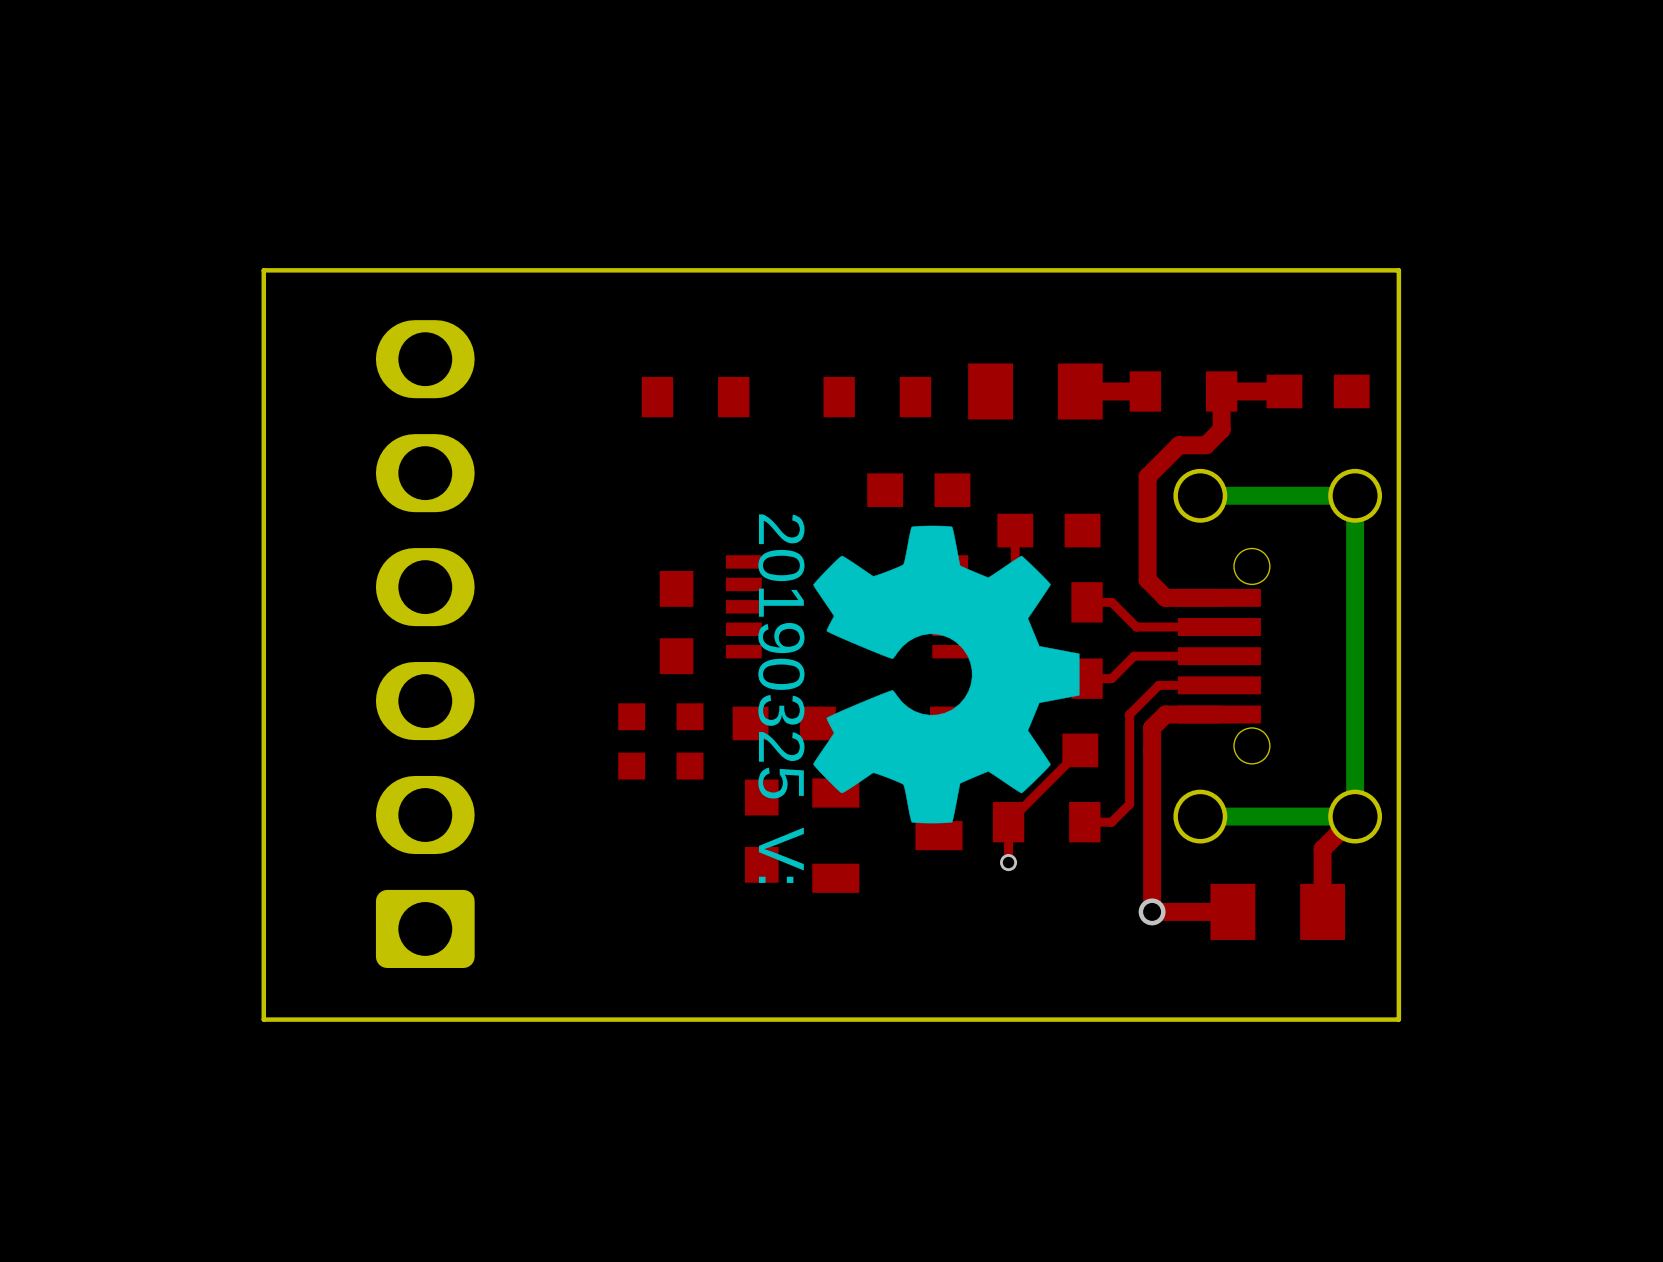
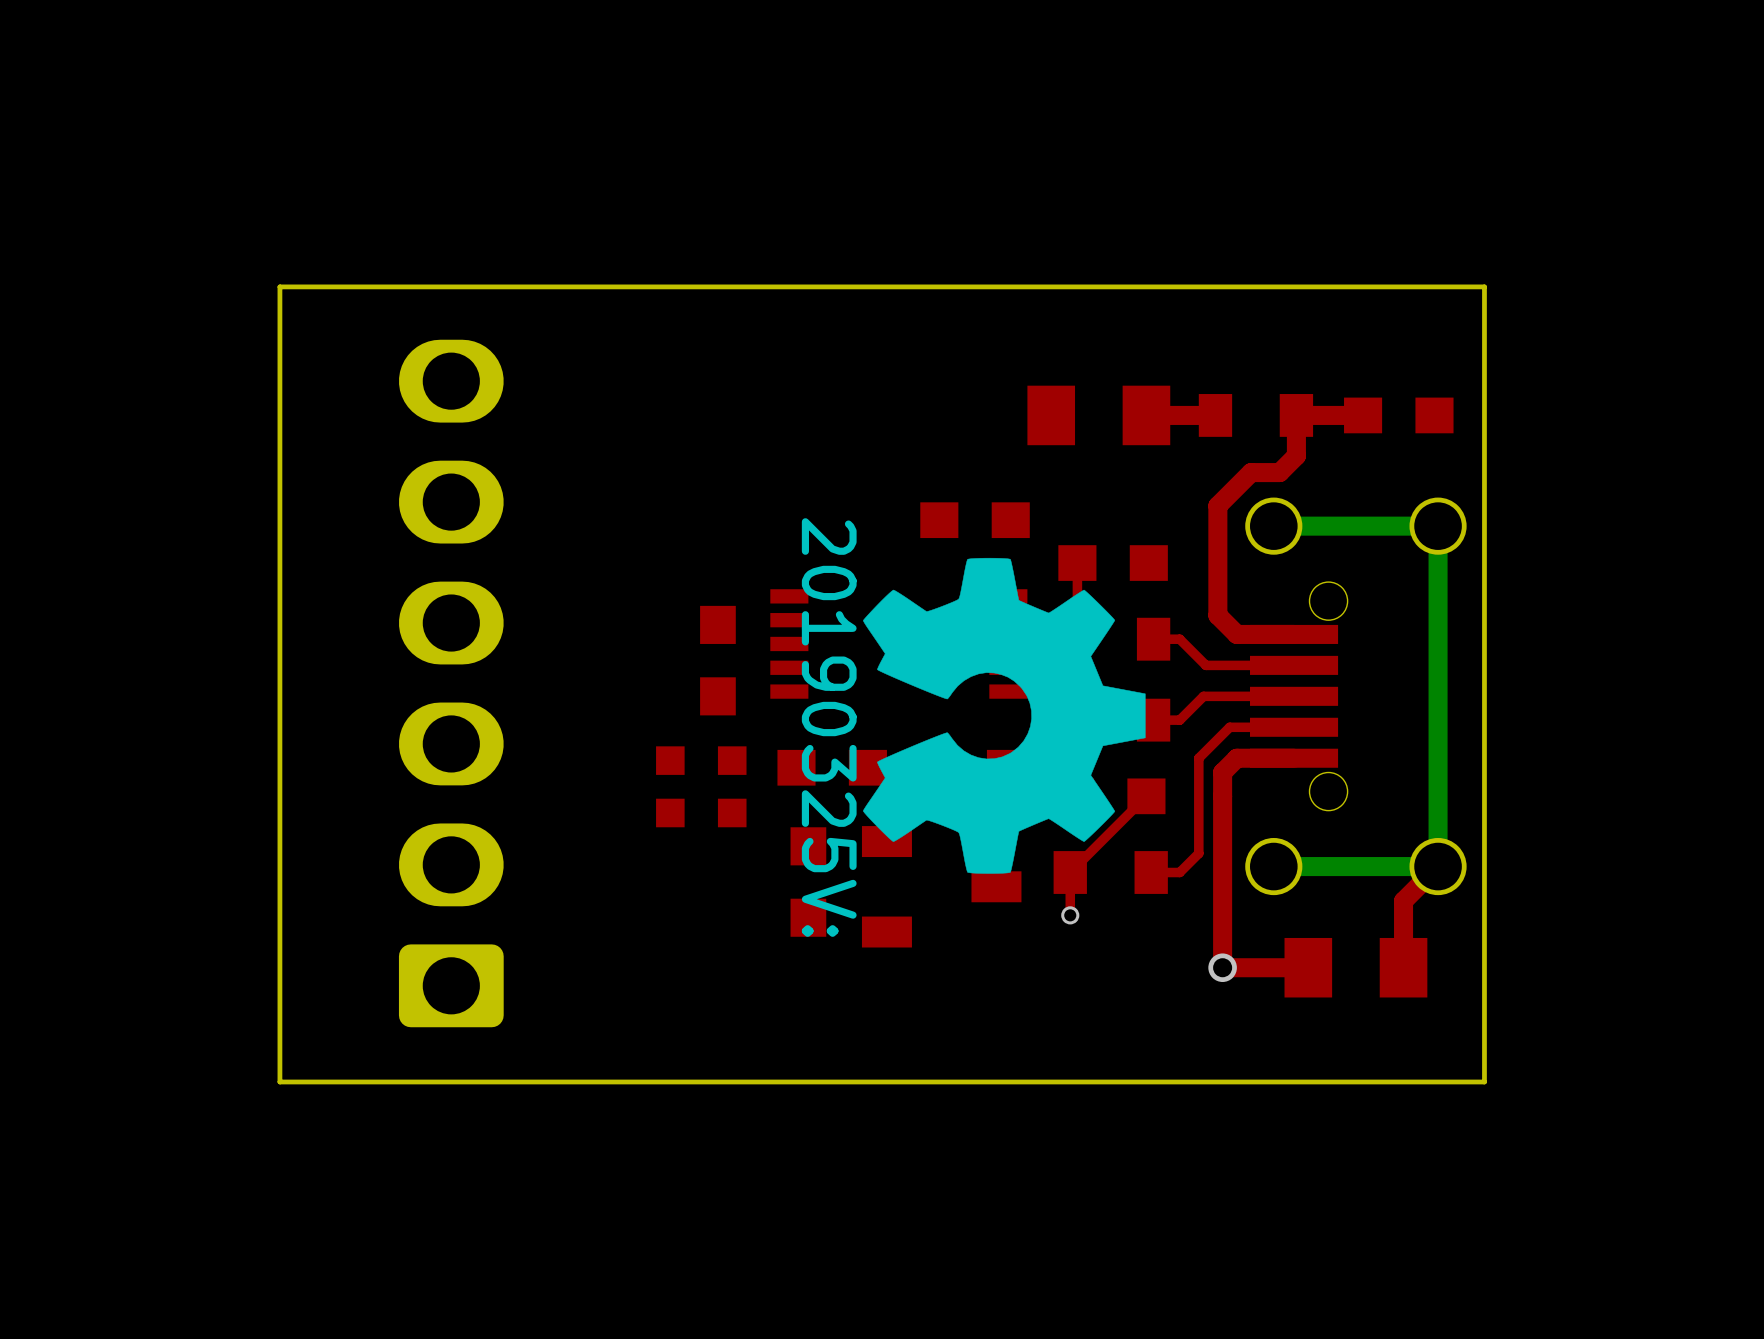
part: (695, 397) -> none
part: (877, 397) -> none

